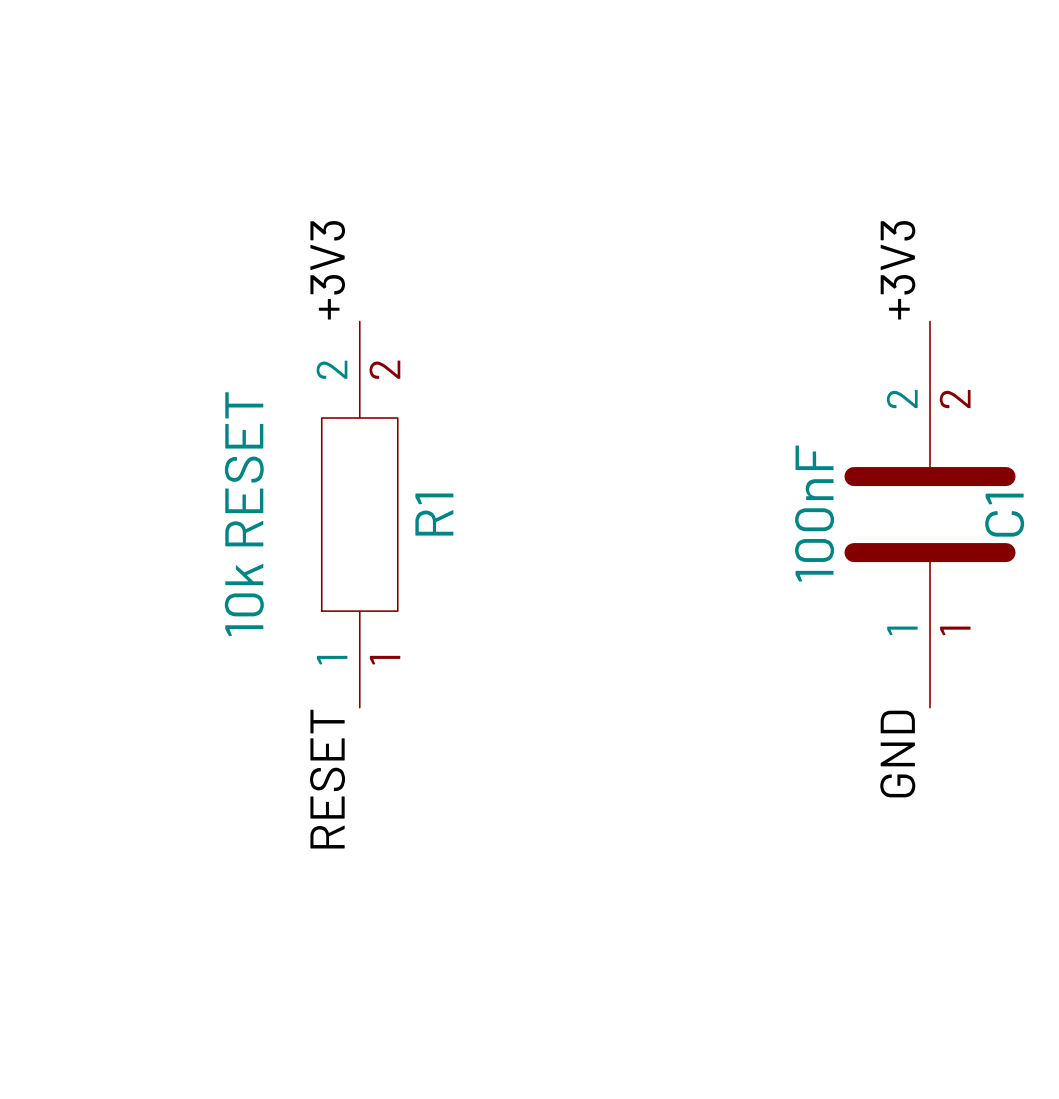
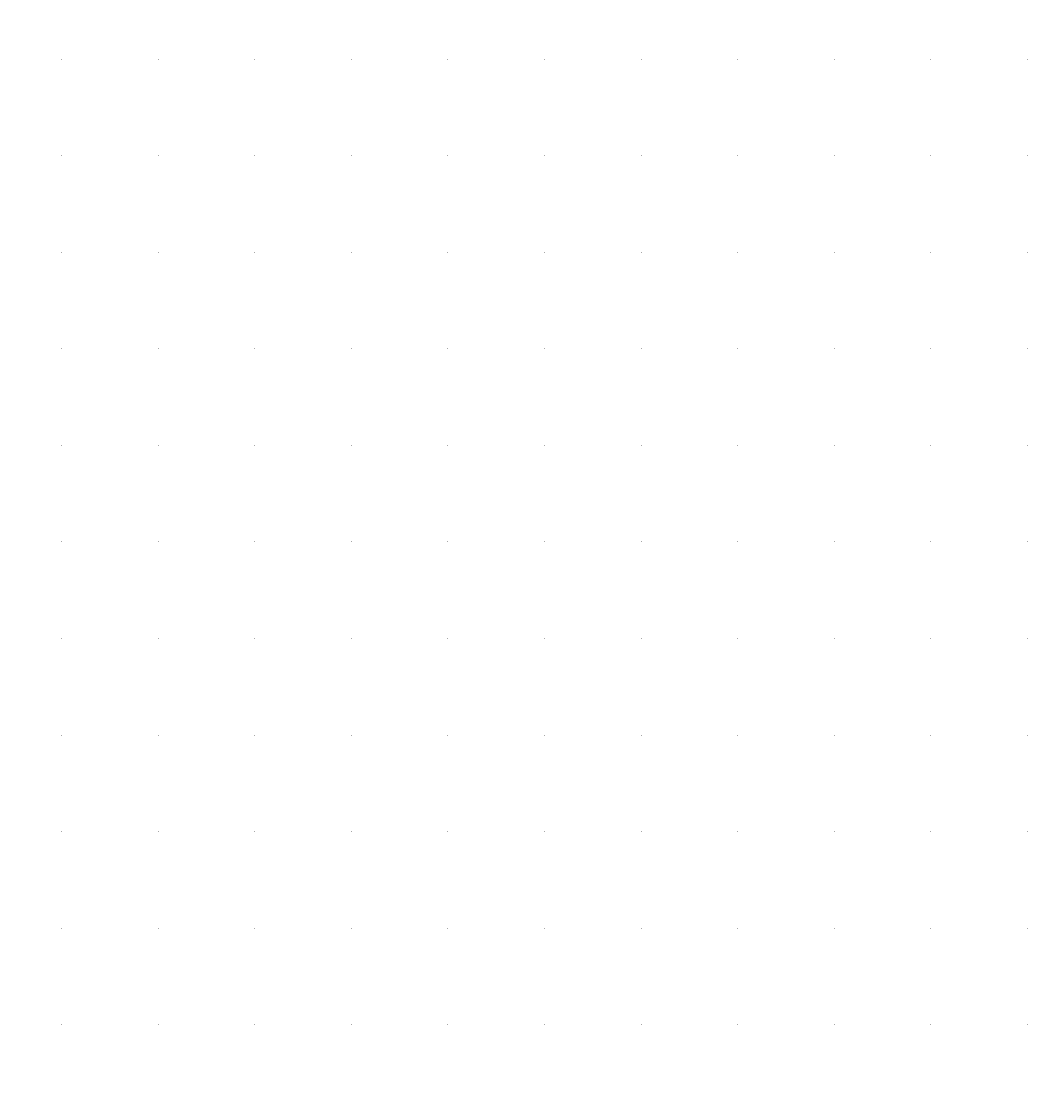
label: +3V3 (327, 270) -> none
label: +3V3 (897, 270) -> none
R1: 10k RESET (359, 514) -> none
C1: 100nF (930, 514) -> none
label: GND (897, 754) -> none
label: RESET (327, 779) -> none

